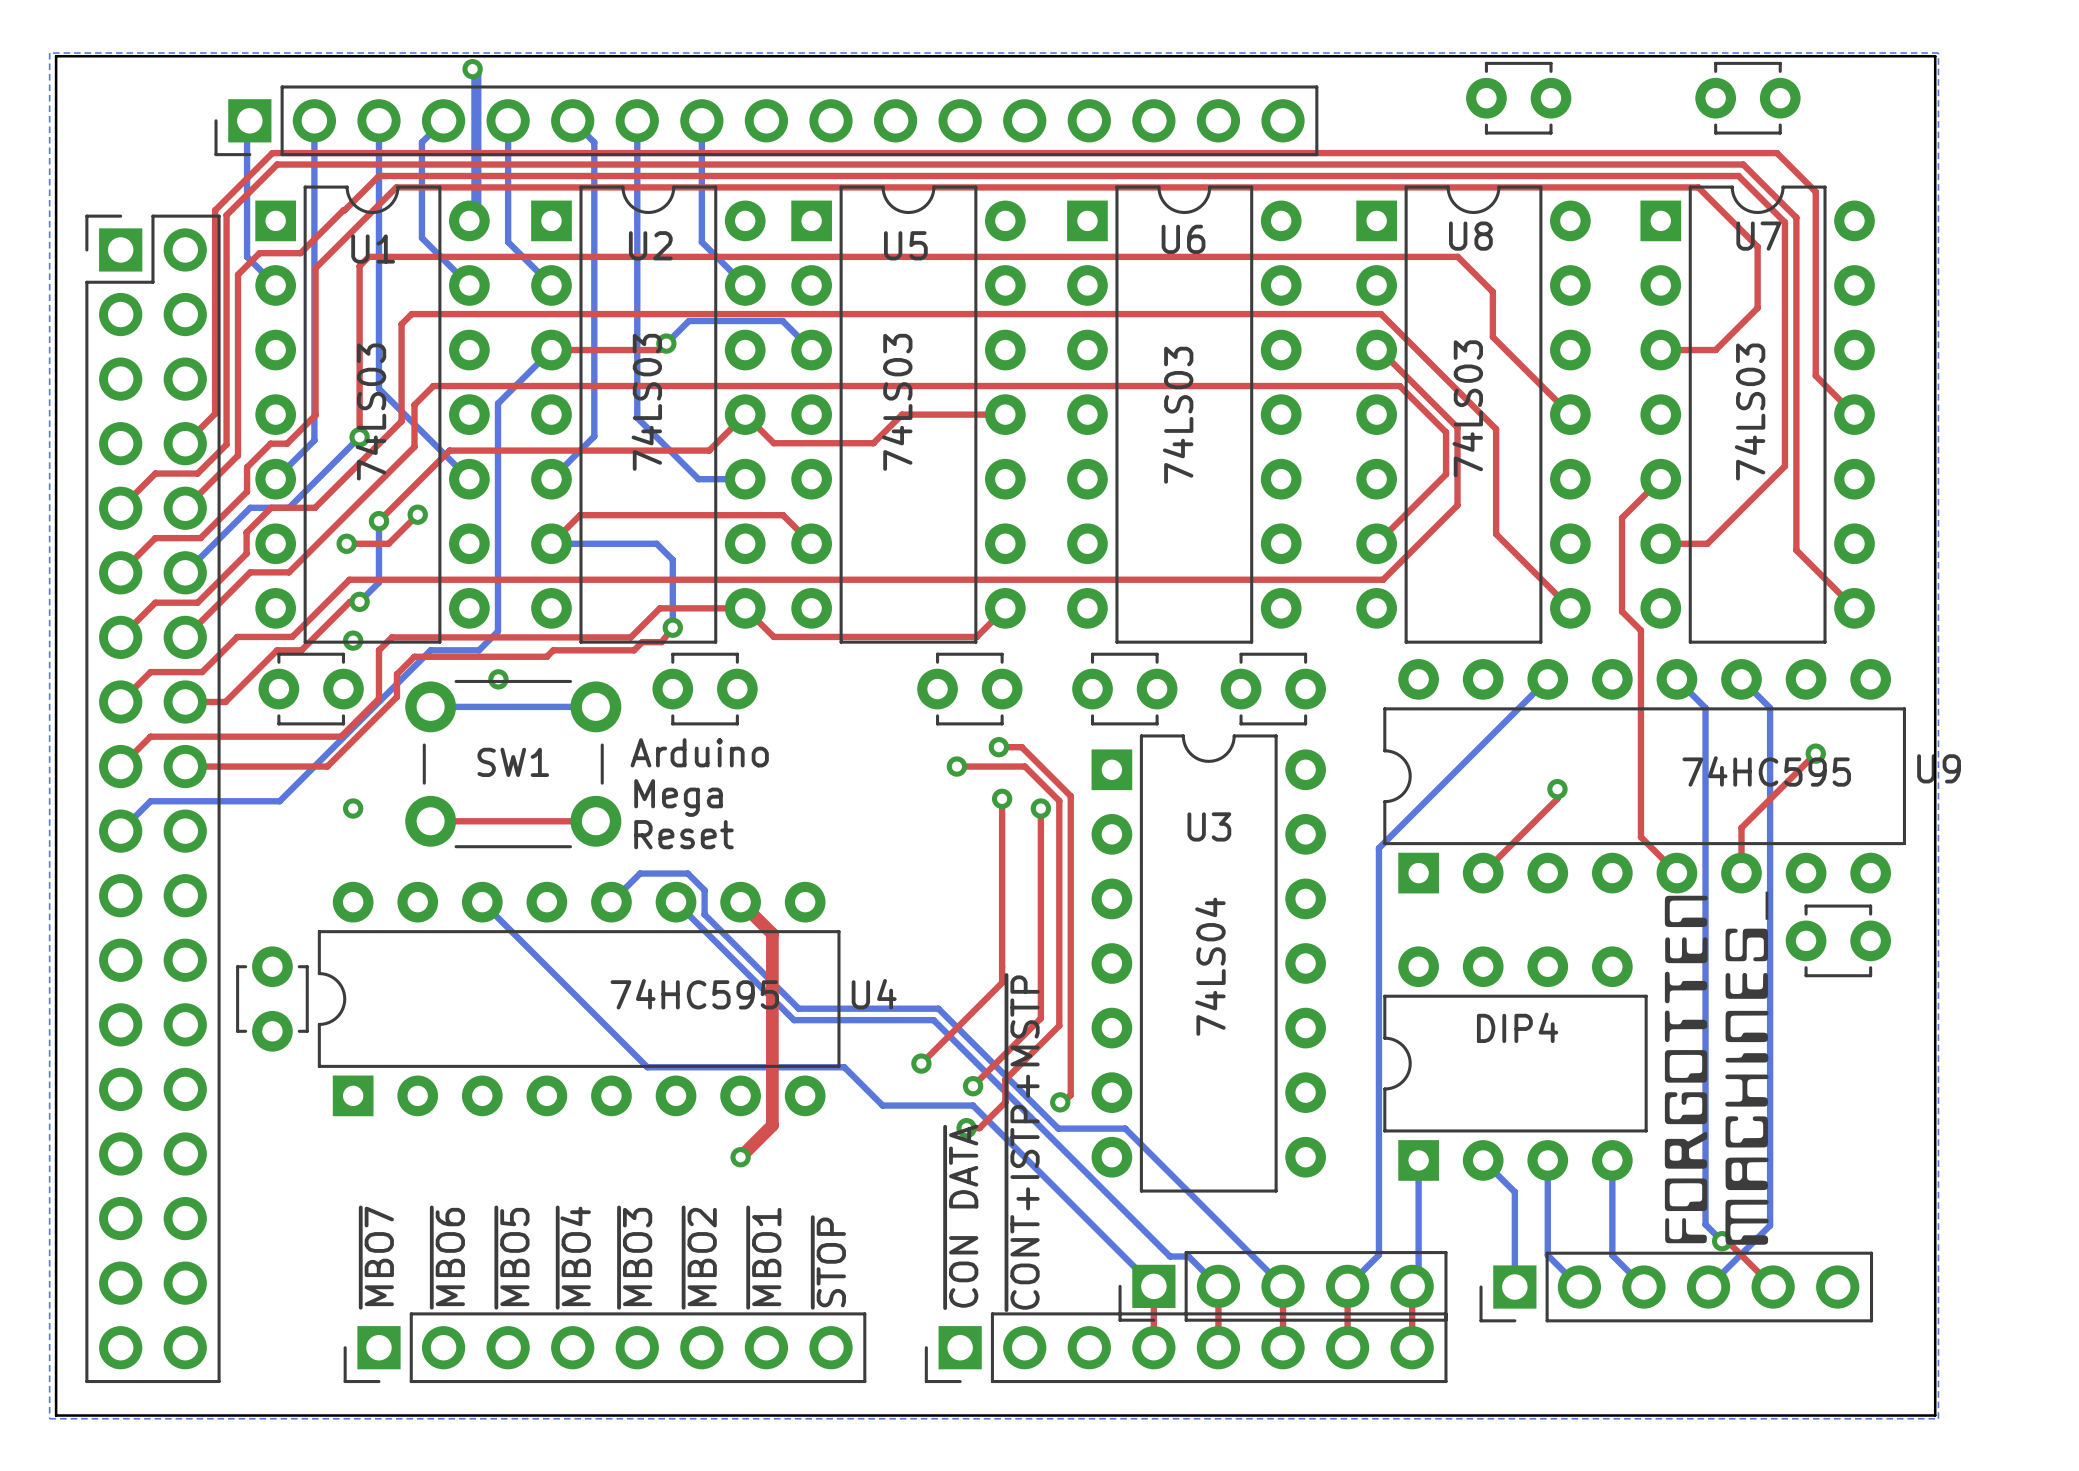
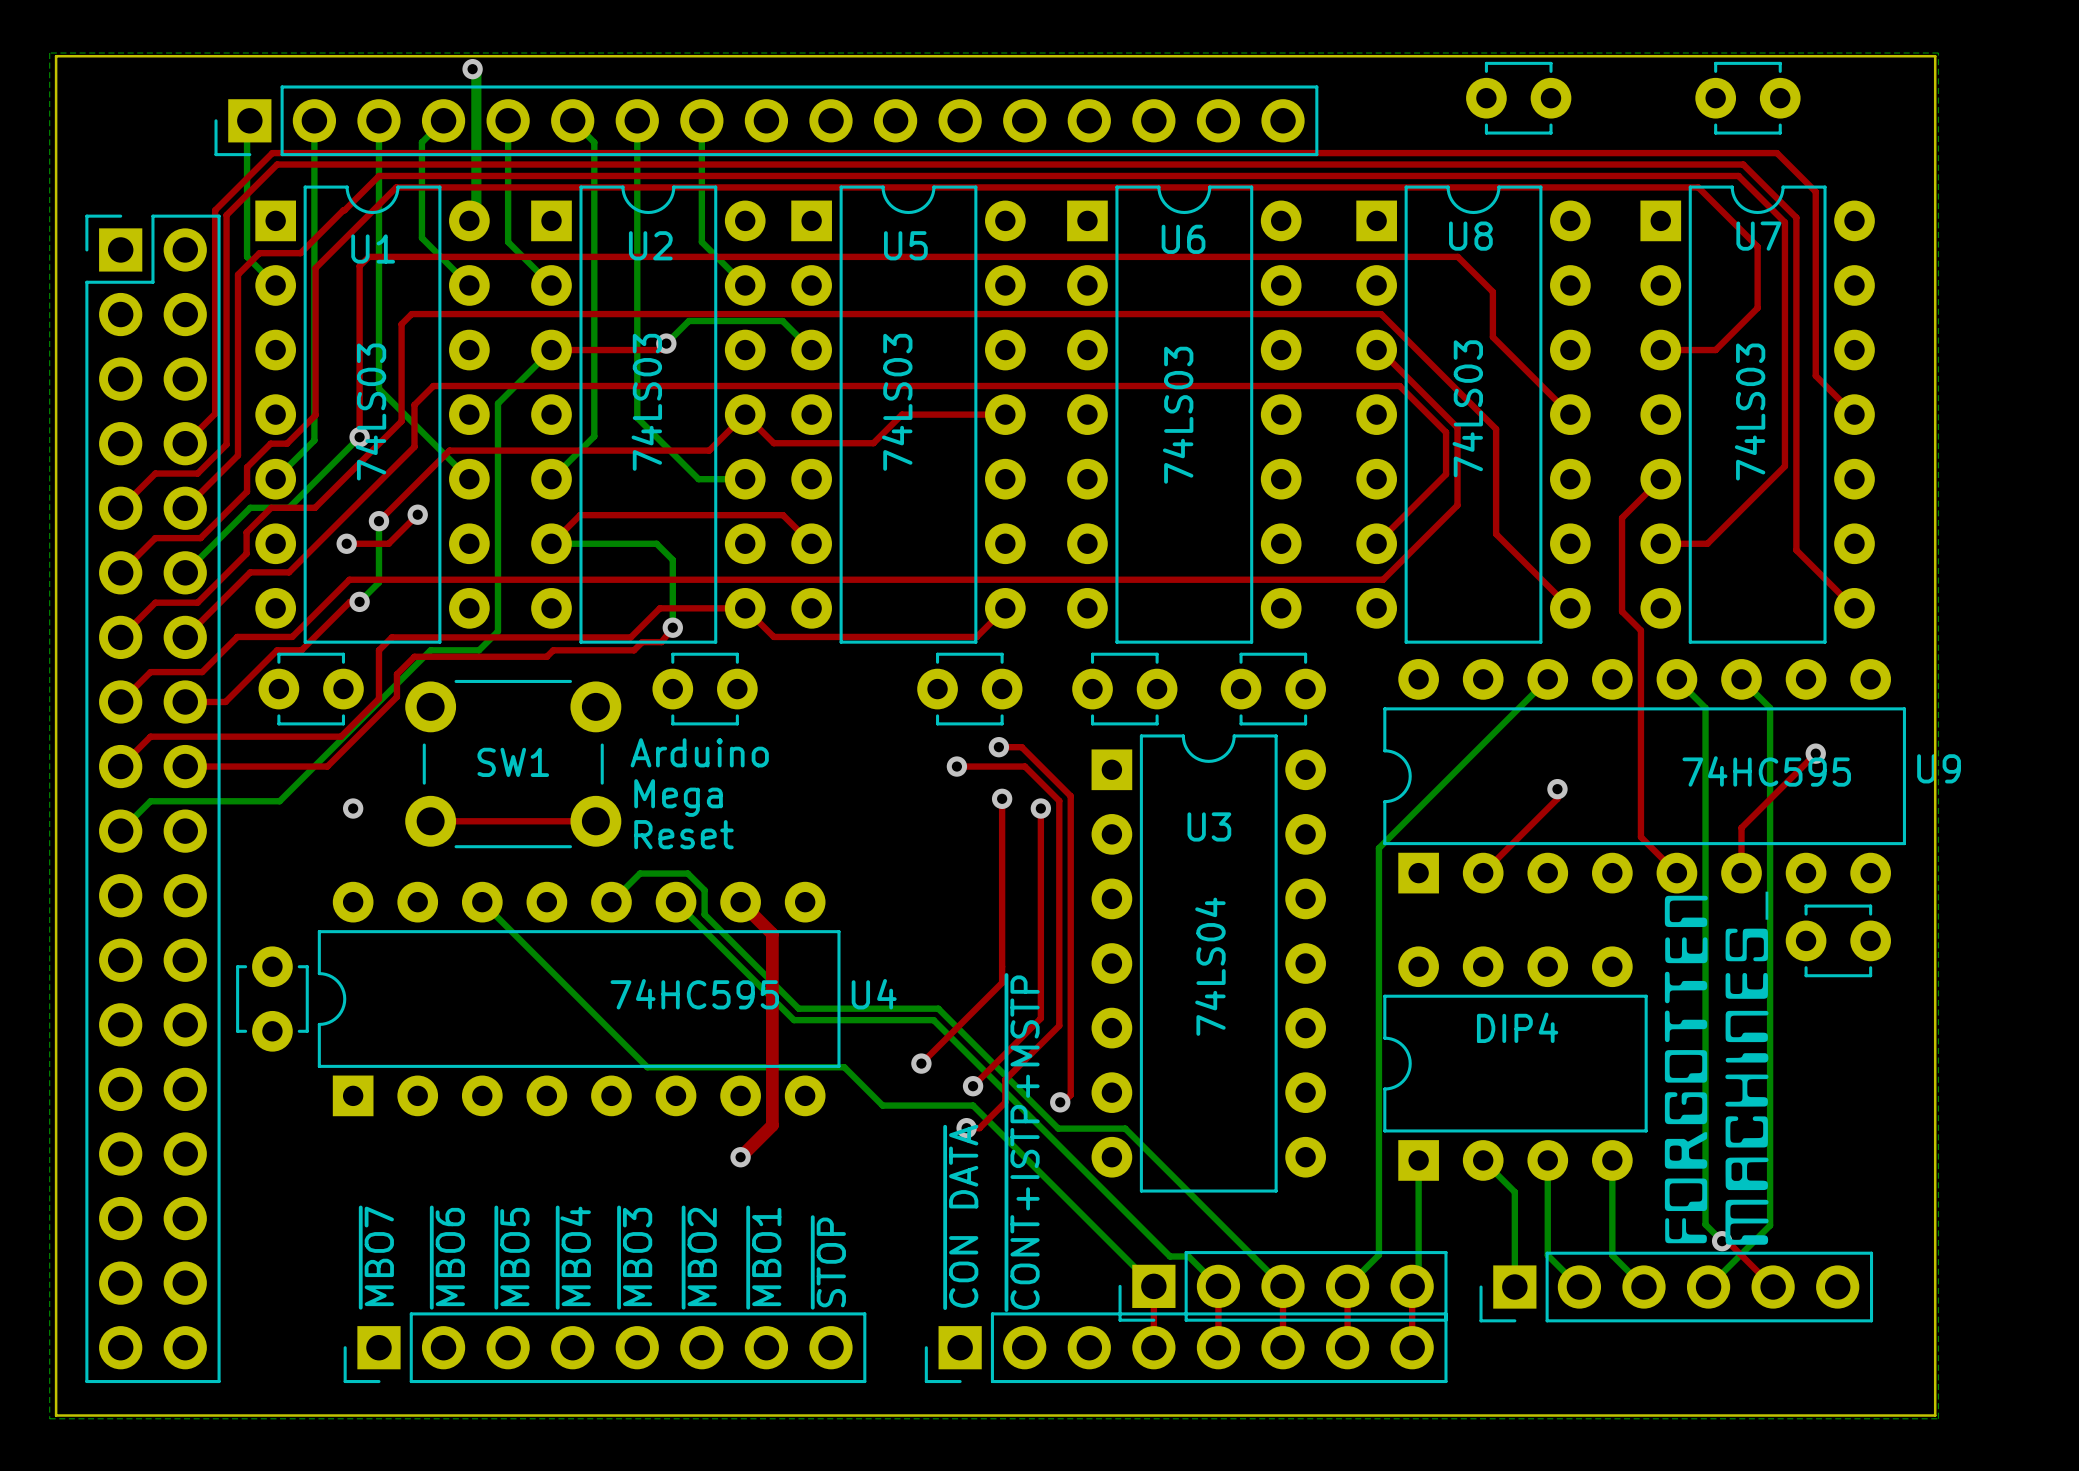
via: (353, 640) -> none
via: (498, 679) -> none
bottom track: (430, 706) (595, 706) -> none

